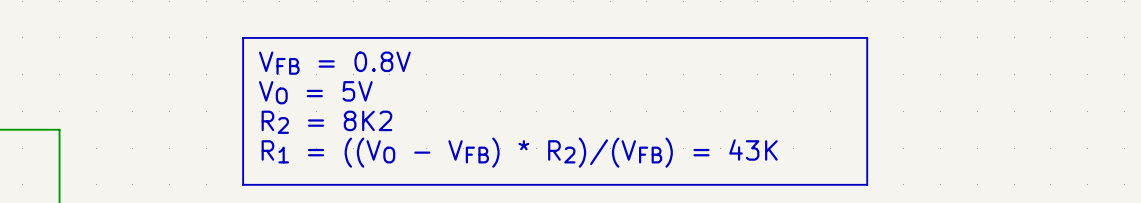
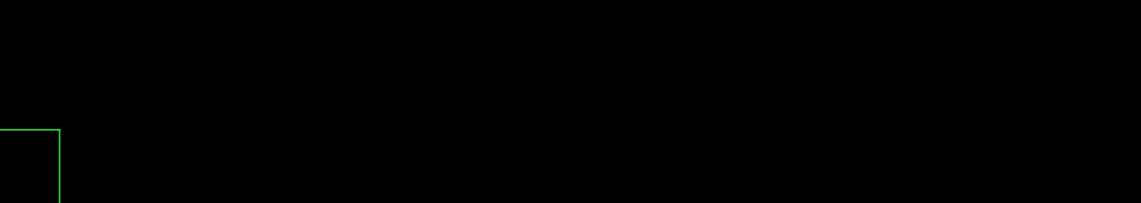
line: (243, 37) (867, 37) (867, 184) (243, 184) (243, 37) -> none
text: VFB = 0.8V (334, 63) -> none
text: VO = 5V (315, 92) -> none
text: R2 = 8K2 (326, 122) -> none
text: R1 = ((VO - VFB) * R2)/(VFB) = 43K (519, 152) -> none

